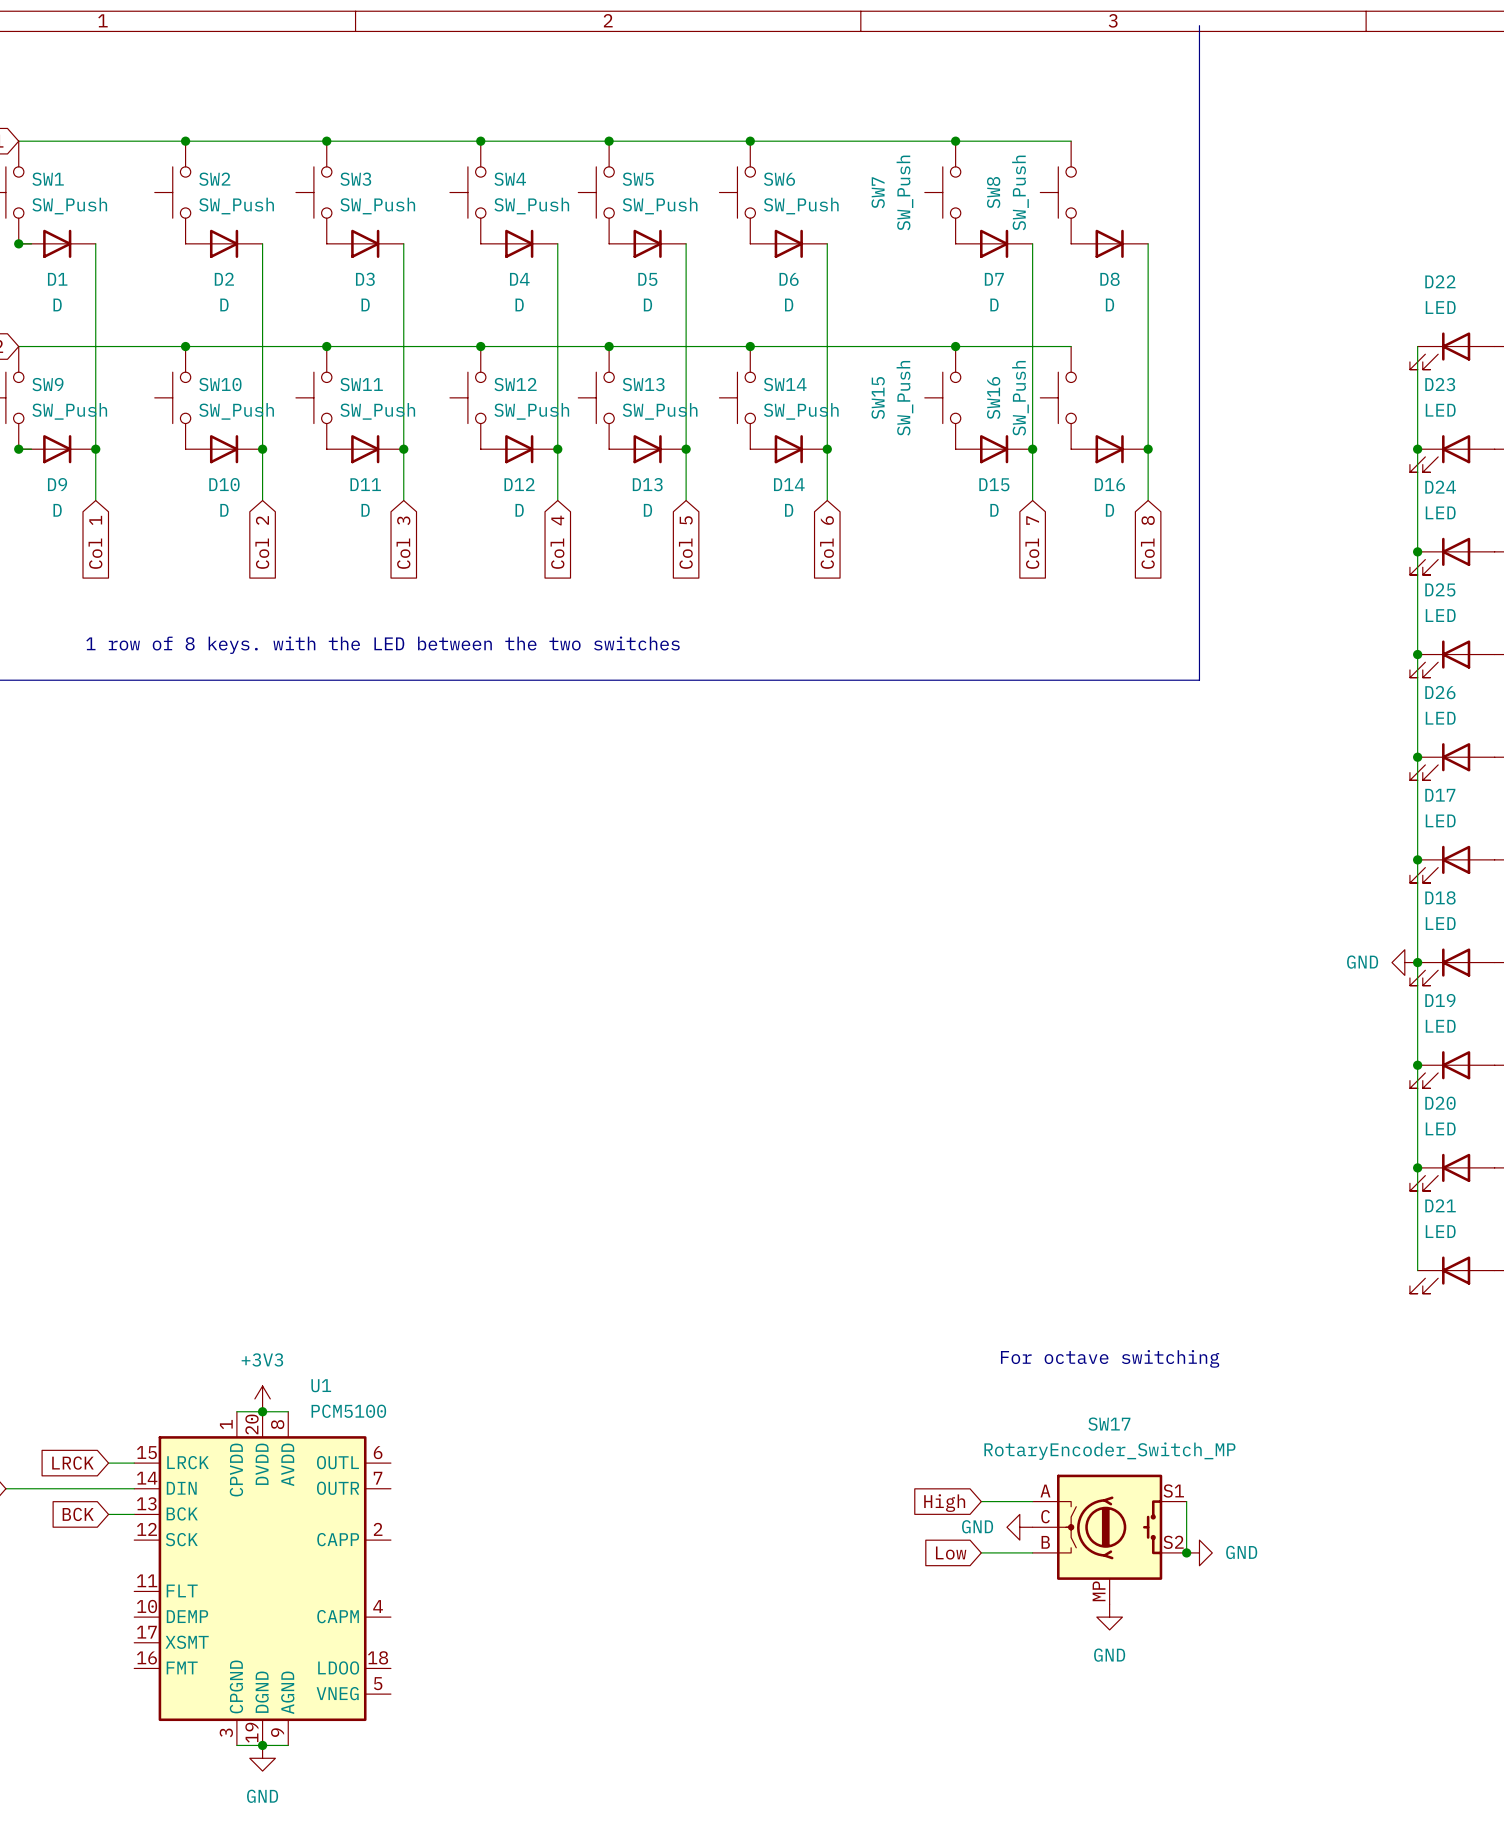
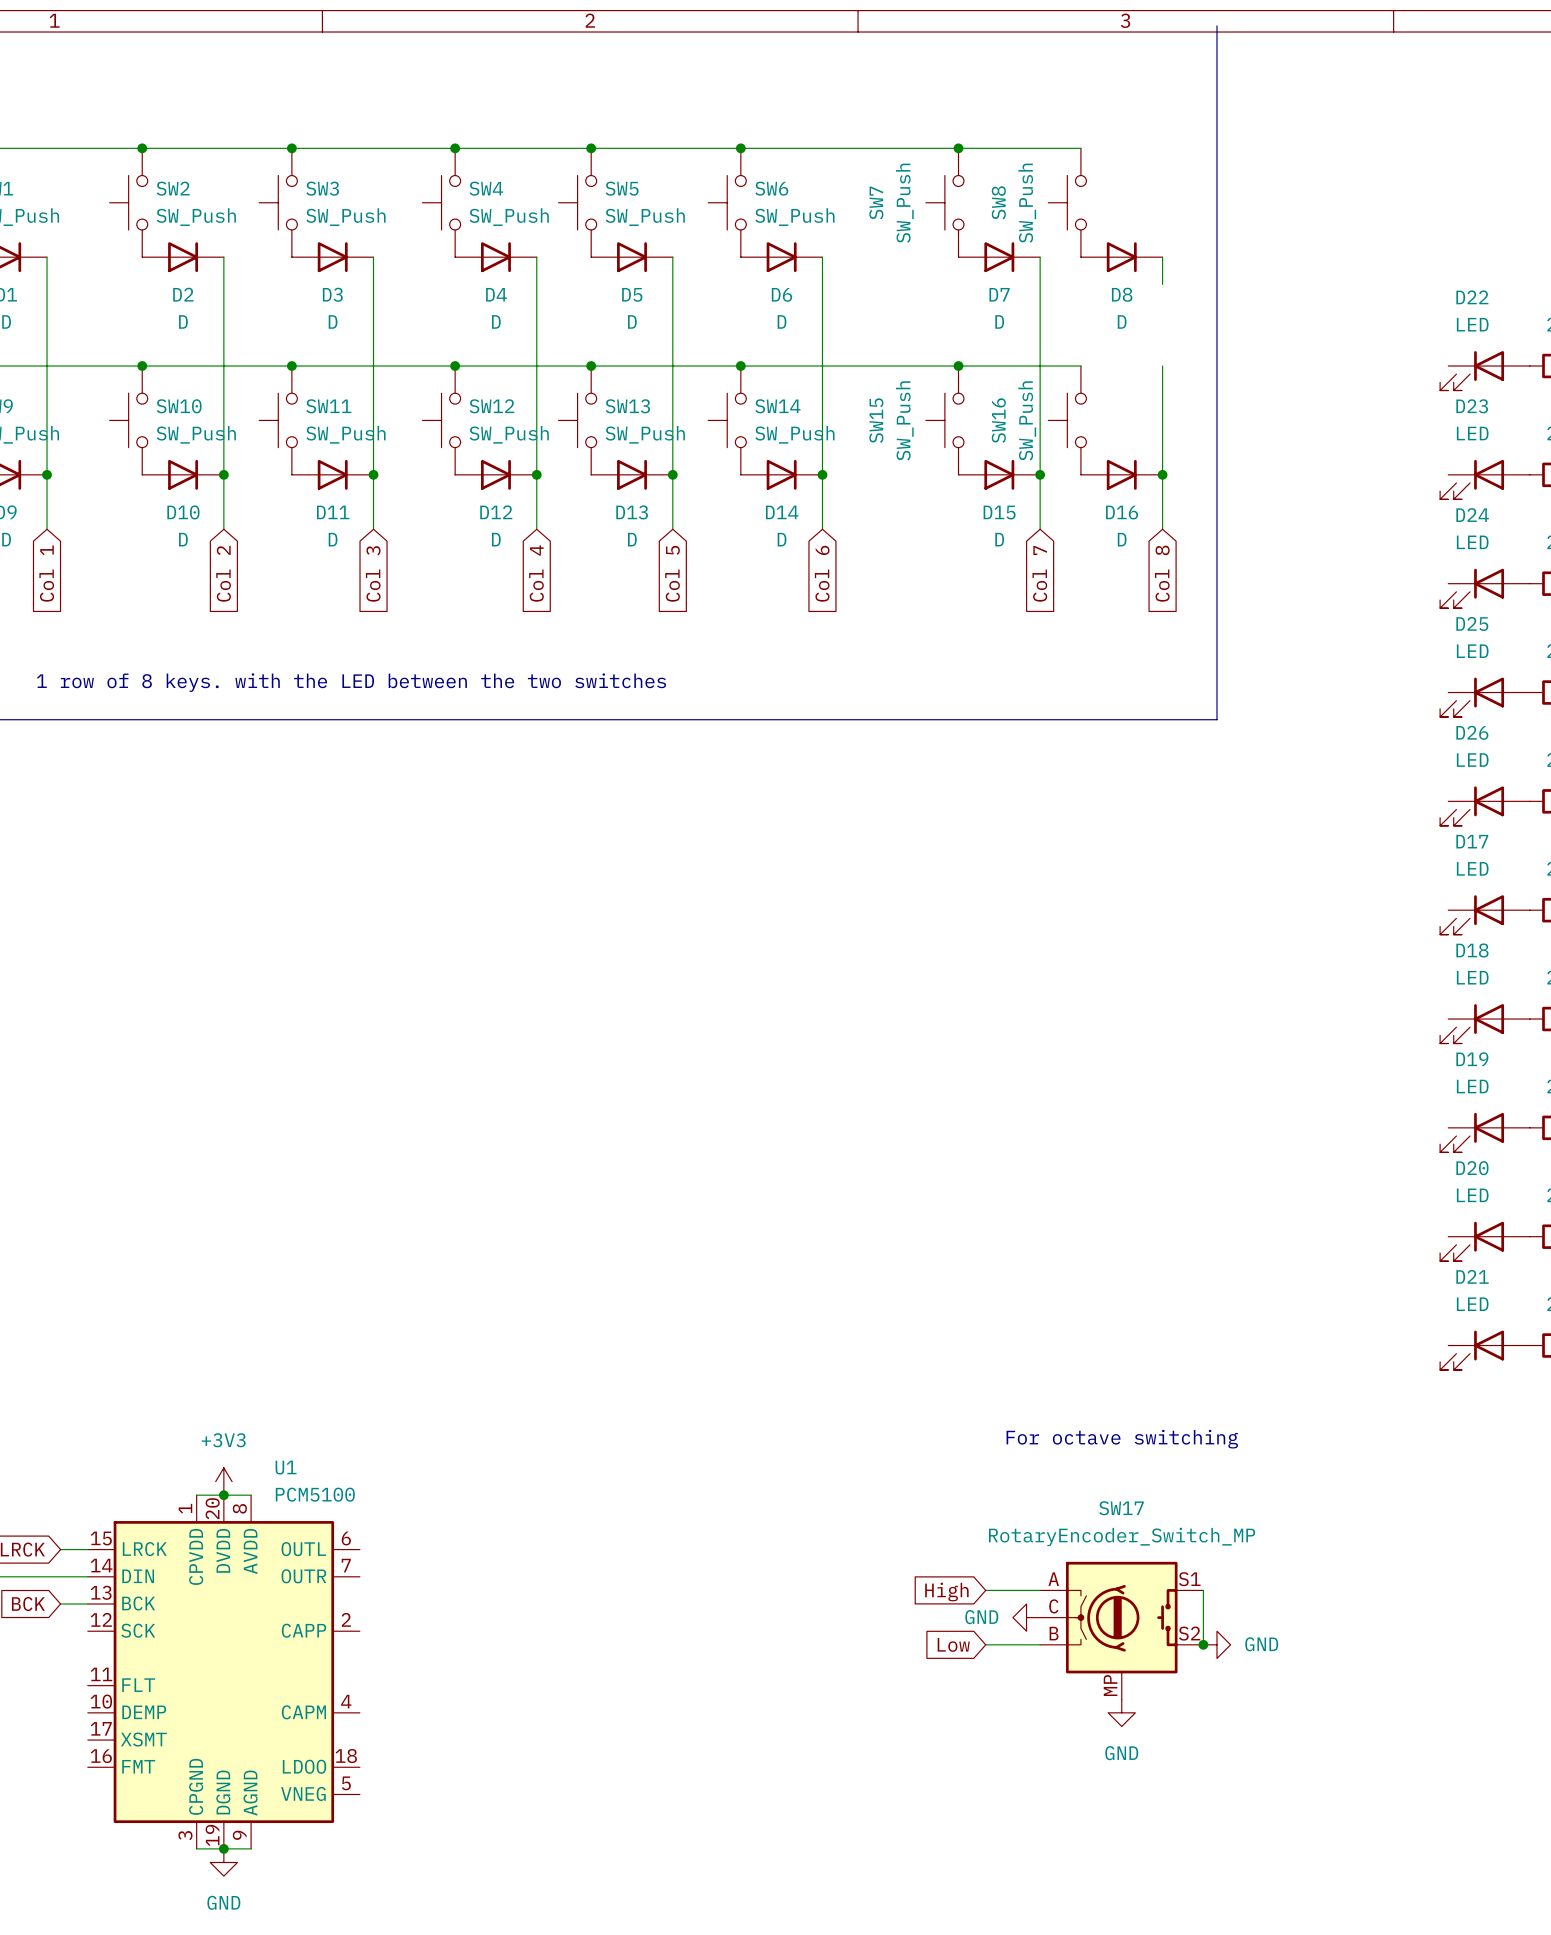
wire: (1148, 269) (1148, 346) -> none
wire: (1417, 346) (1417, 1270) -> none
junction: (1417, 449) -> none
junction: (1417, 551) -> none
junction: (1417, 654) -> none
junction: (1417, 757) -> none
junction: (1417, 859) -> none
power symbol: GND (1404, 962) -> none
junction: (1417, 962) -> none
junction: (1417, 1065) -> none
junction: (1417, 1167) -> none

